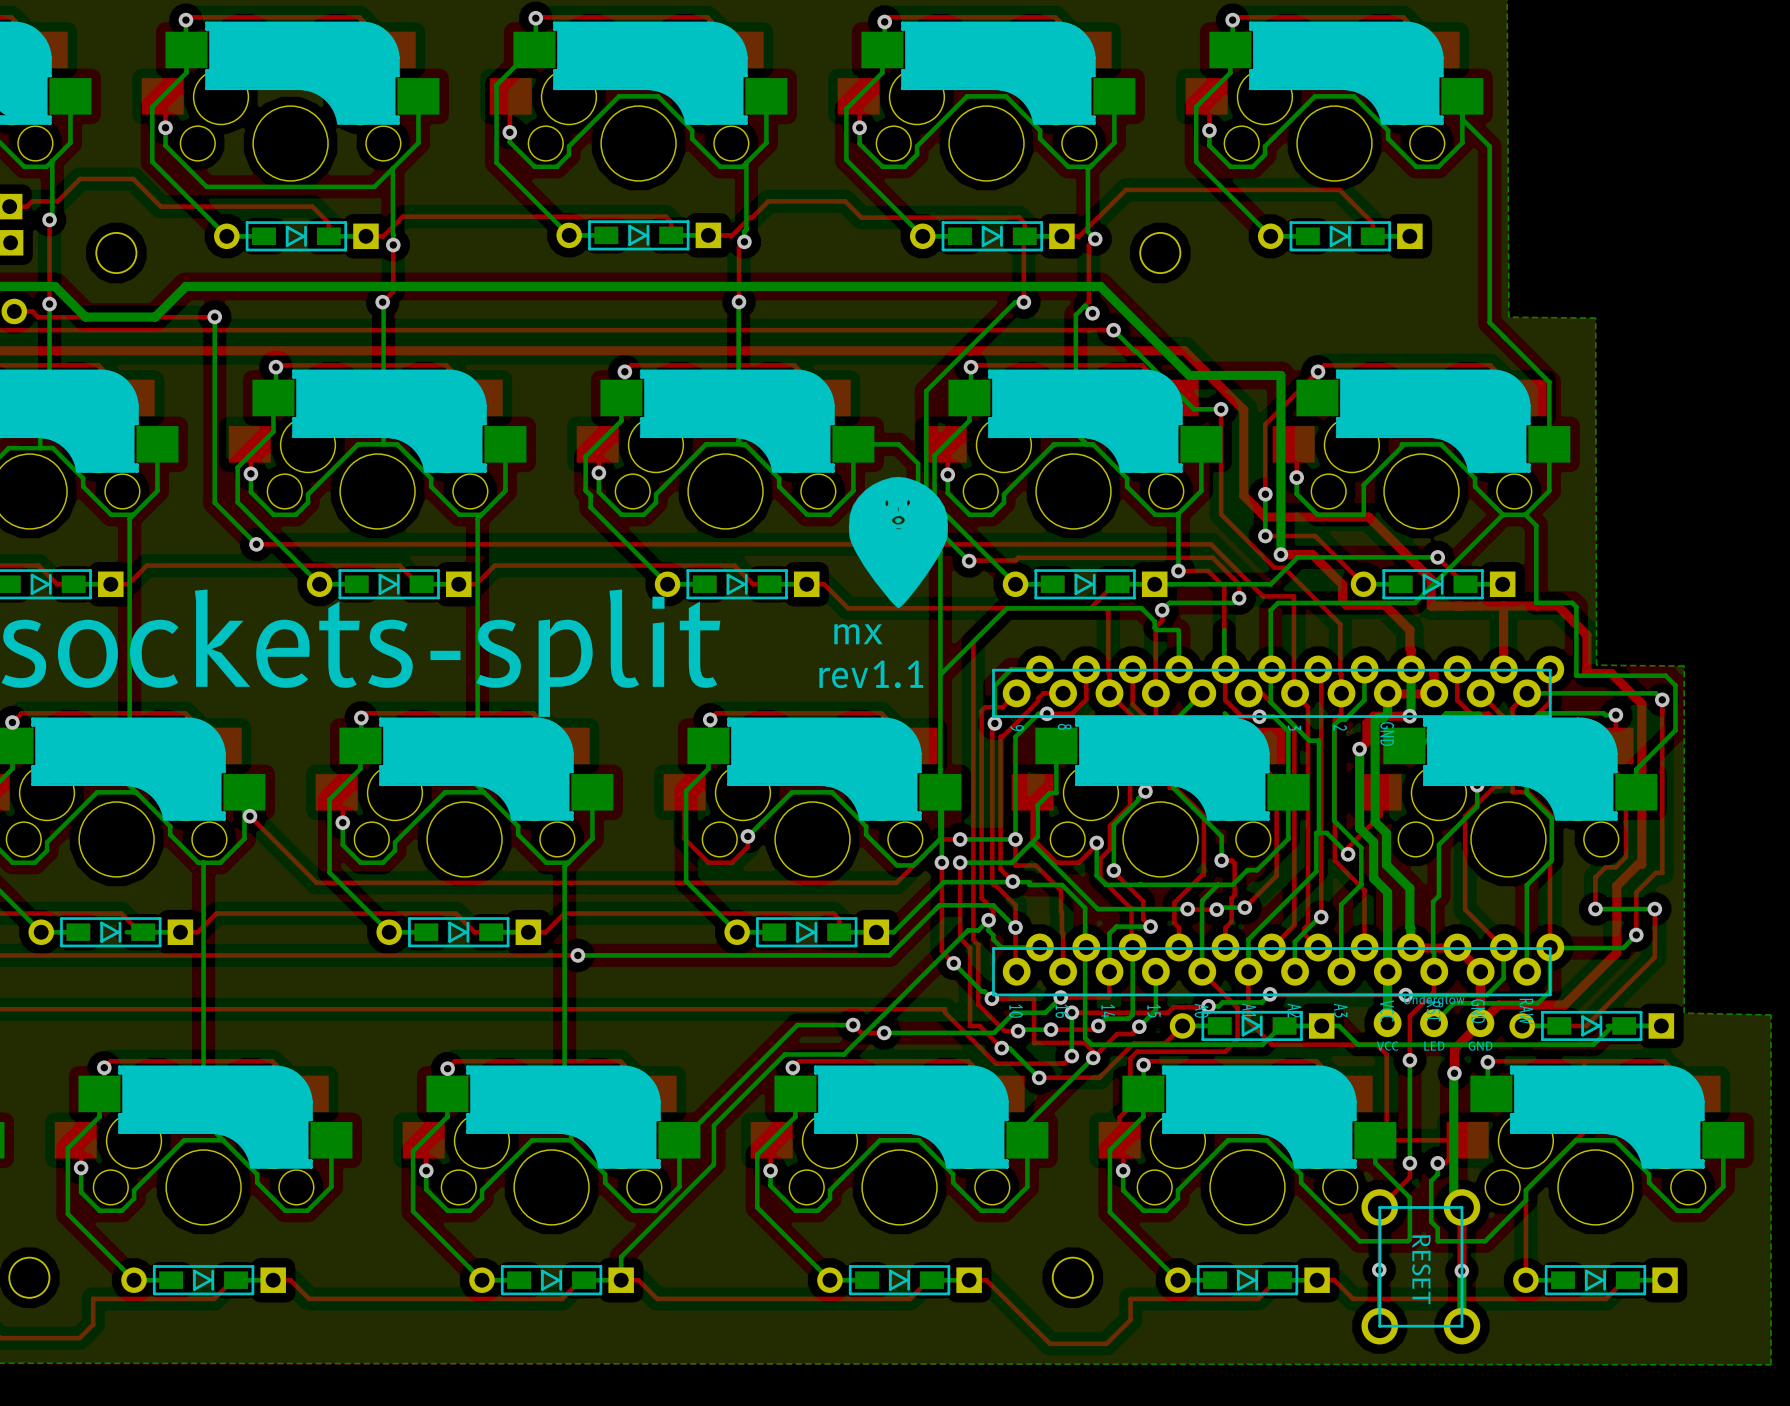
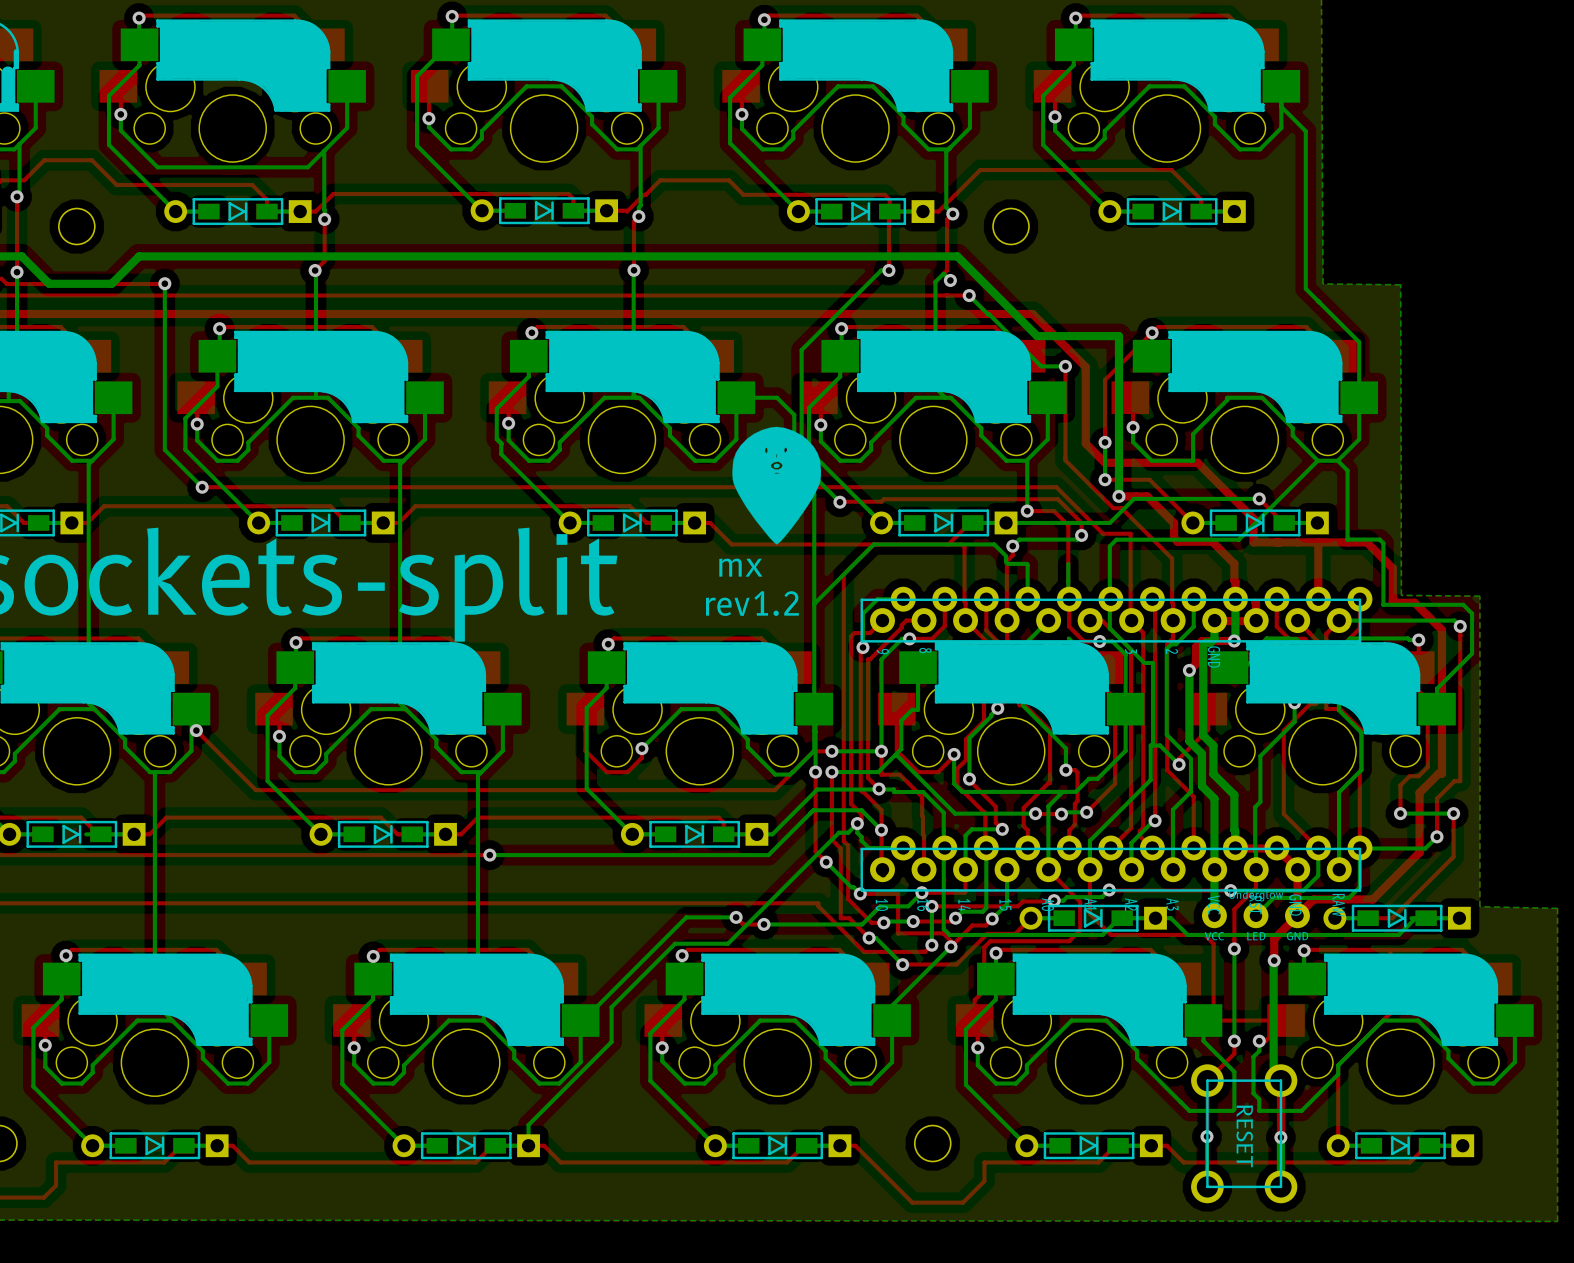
text: rev1.1 (871, 674) -> rev1.2 (752, 603)

